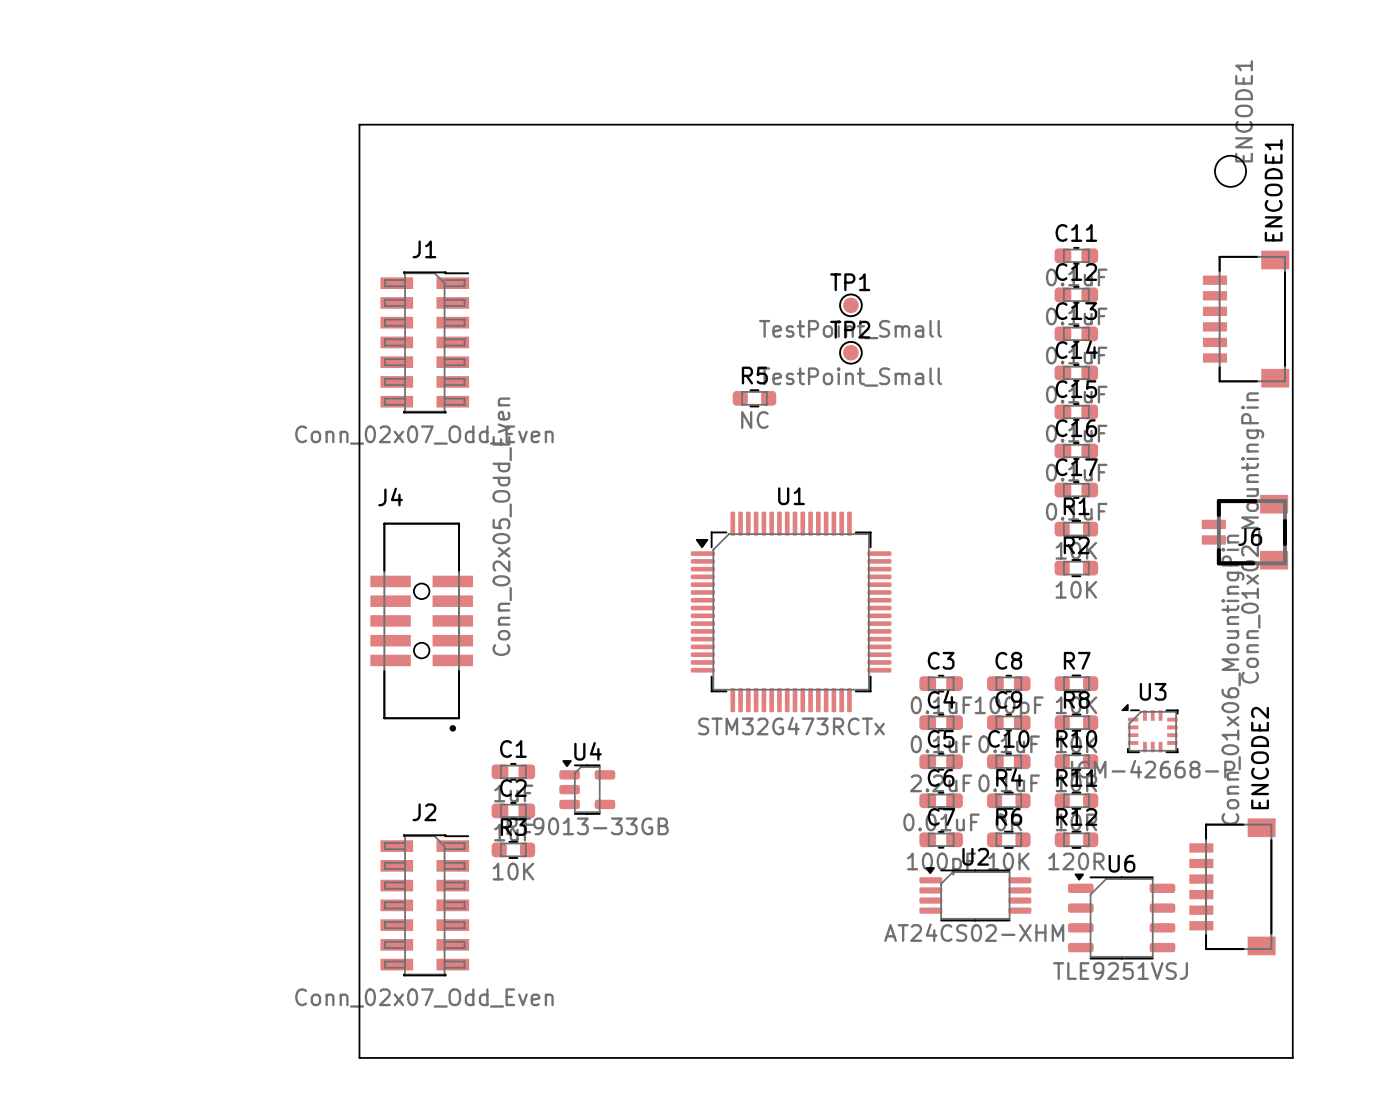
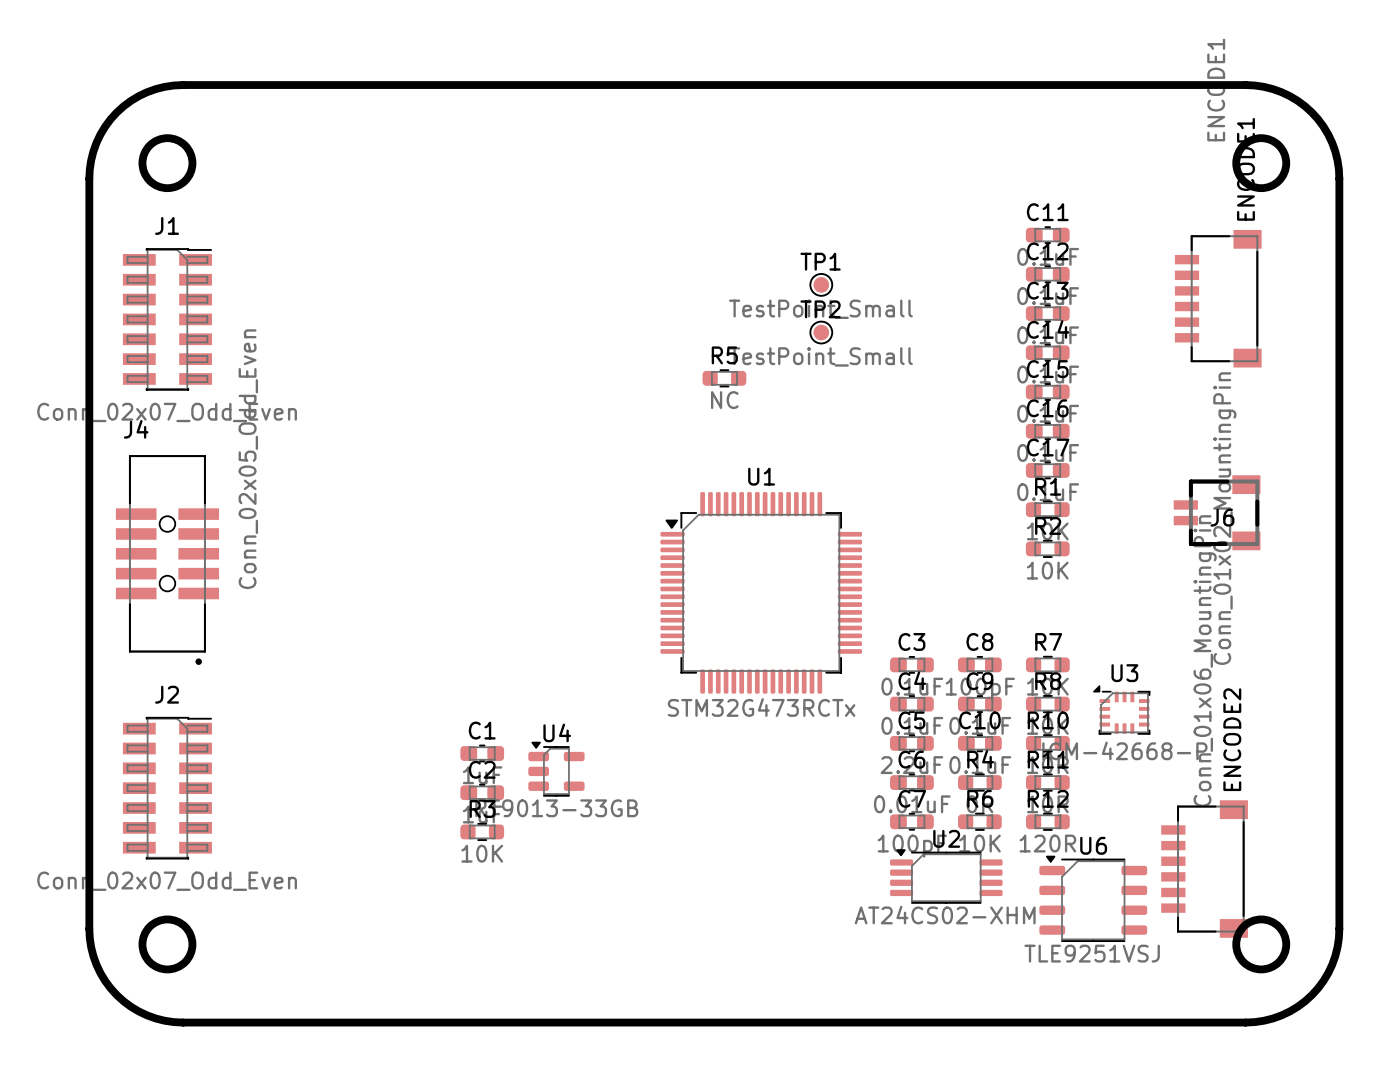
board edge: (359, 124) (1292, 124) (1292, 1057) (359, 1057) (359, 124) -> (183, 85) (164, 86) (147, 92) (123, 106) (110, 119) (100, 134) (93, 151) (89, 169) (89, 928) (91, 947) (96, 964) (110, 988) (123, 1001) (147, 1015) (164, 1020) (183, 1022) (1245, 1022) (1263, 1020) (1281, 1015) (1305, 1001) (1318, 988) (1332, 964) (1337, 947) (1339, 928) (1339, 178) (1337, 160) (1332, 142) (1318, 119) (1305, 106) (1281, 92) (1263, 86) (1245, 85) (183, 85)
round board edge: none -> [138, 134, 197, 193]
round board edge: [1214, 155, 1247, 188] -> none
round board edge: none -> [1232, 134, 1291, 193]
J1 position: (424, 342) -> (167, 319)
J4 position: (421, 627) -> (167, 559)
J2 position: (424, 905) -> (167, 788)
round board edge: none -> [138, 915, 197, 974]
round board edge: none -> [1232, 915, 1291, 974]

